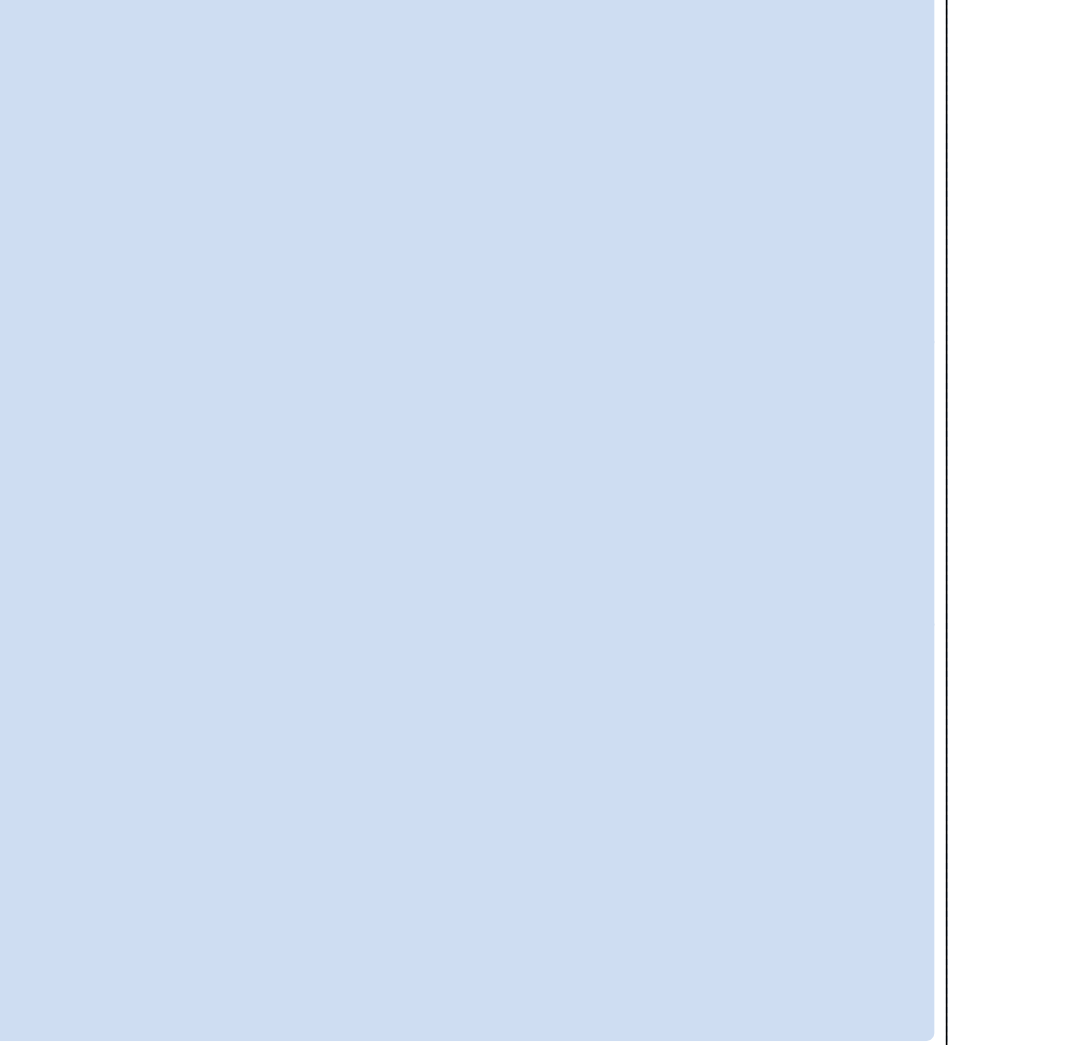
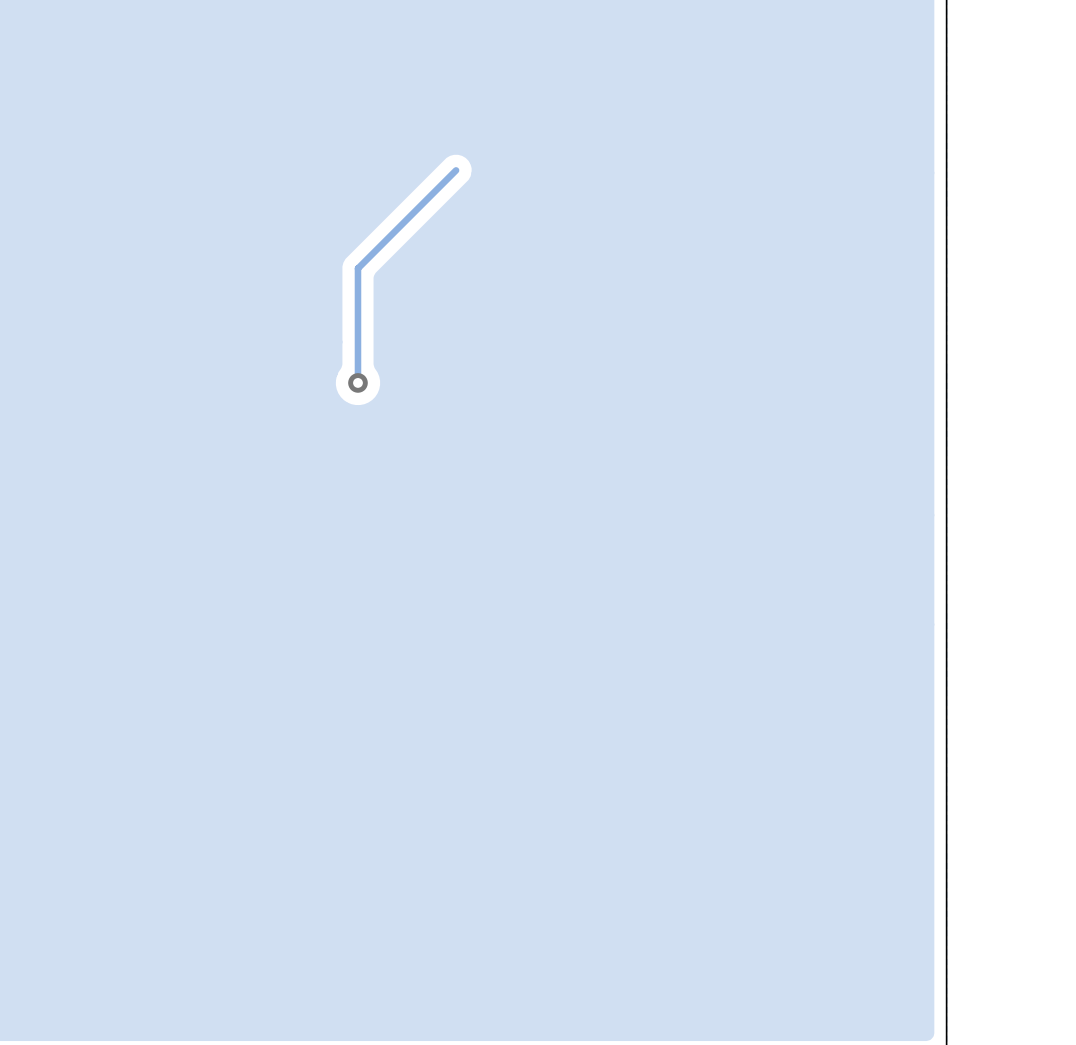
track: none -> (456, 170) (357, 268) (357, 382)
via: none -> (357, 382)

